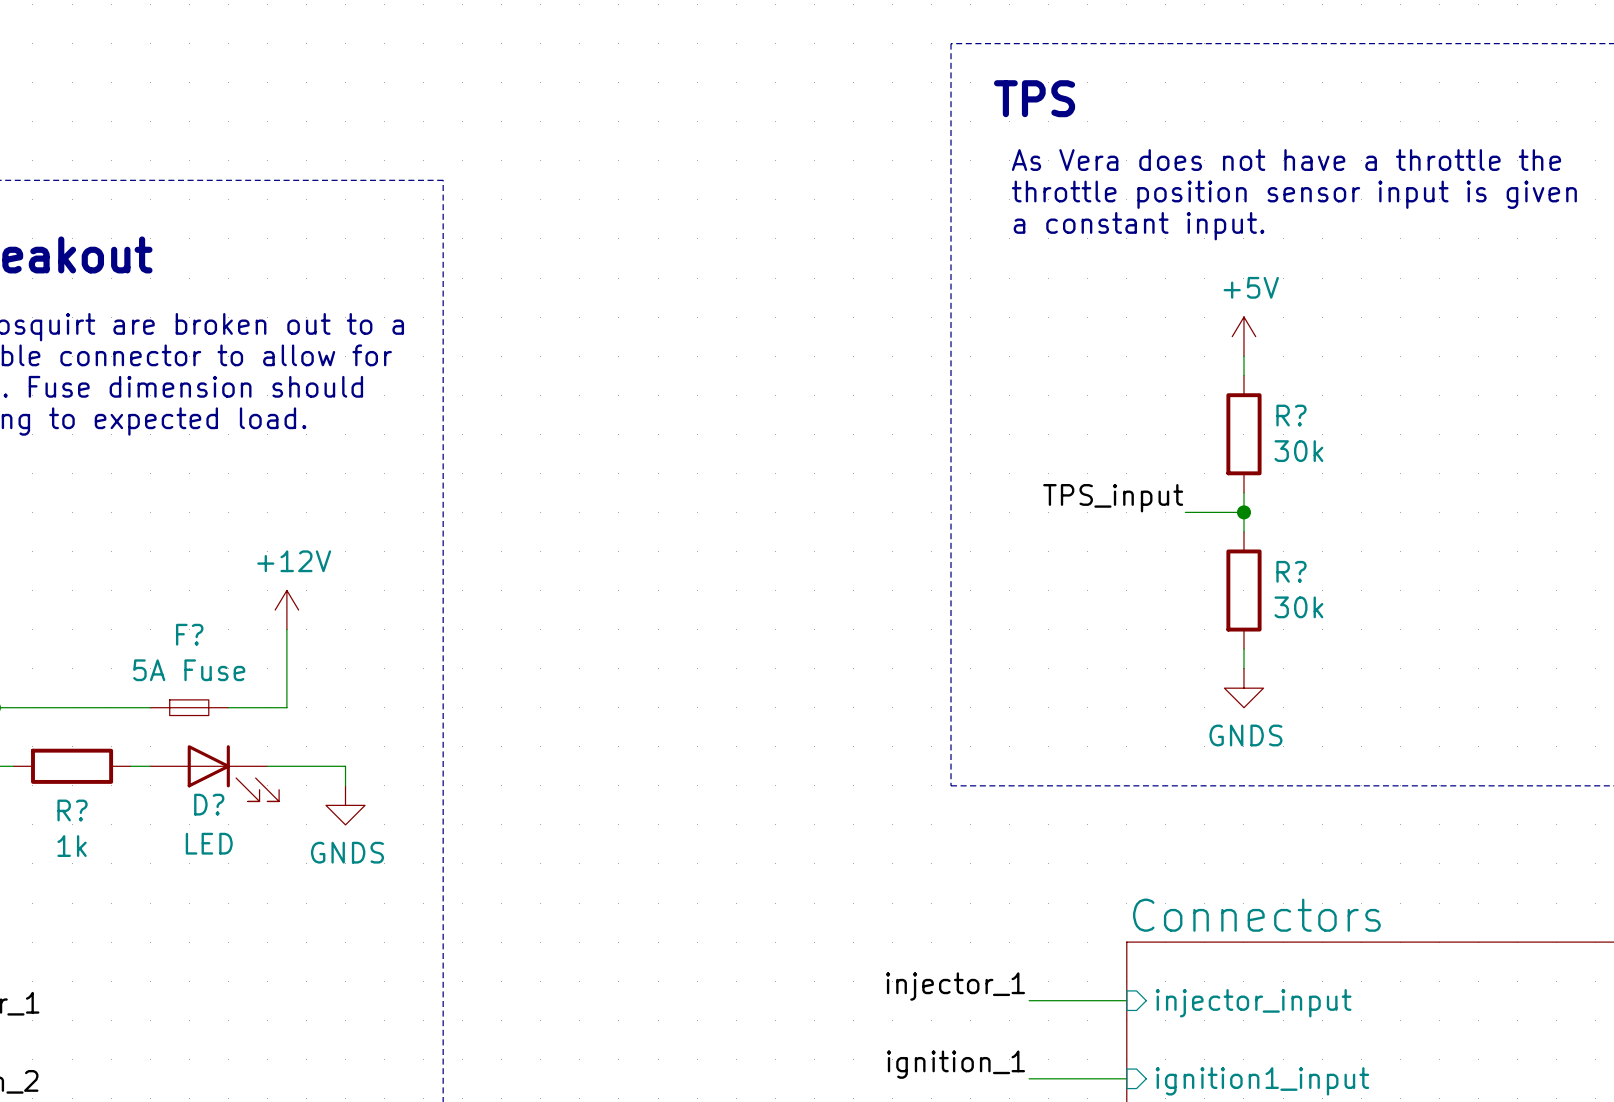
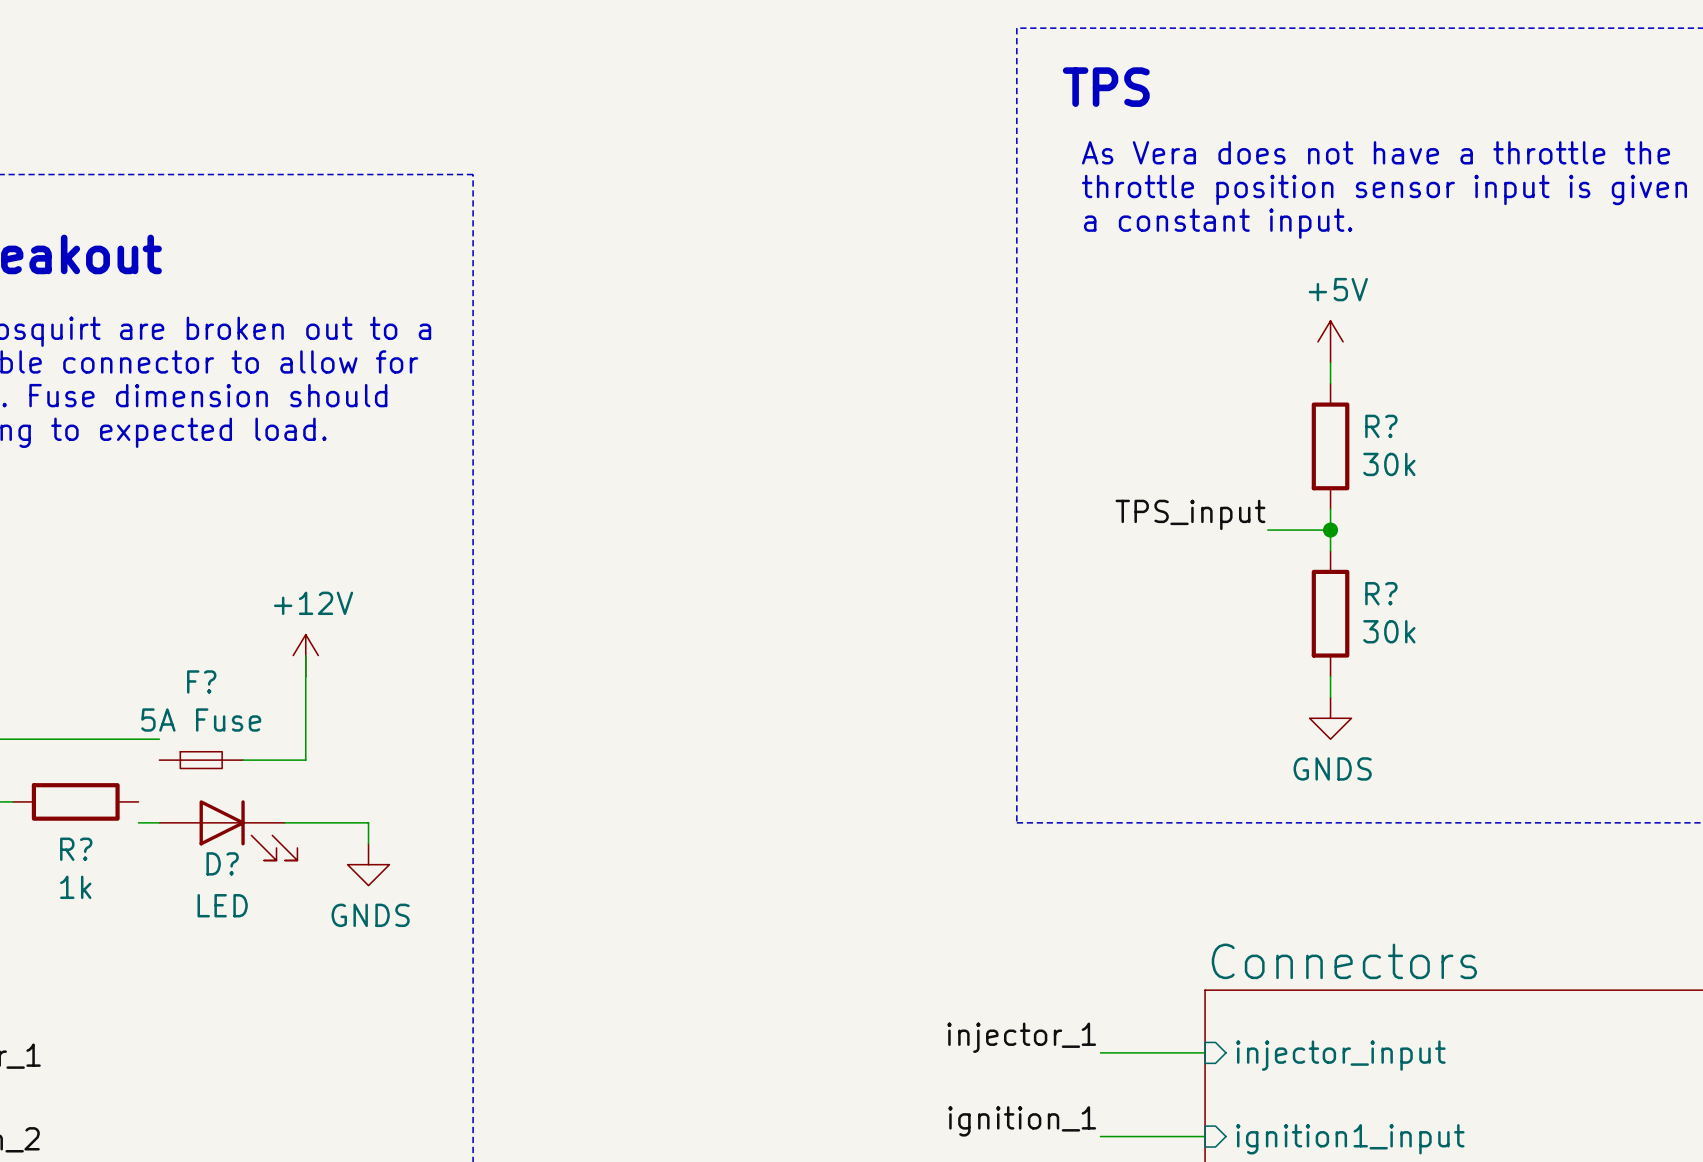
power symbol position: +12V (286, 610) -> +12V (305, 655)
F? position: (189, 707) -> (201, 760)
wire: (228, 707) (286, 707) -> (243, 760) (305, 760) (305, 739)
wire: (130, 766) (150, 766) -> (138, 822) (159, 822)
wire: (267, 766) (345, 766) (345, 785) -> (284, 822) (368, 822) (368, 843)
D? position: (214, 773) -> (228, 830)
power symbol position: GNDS (345, 805) -> GNDS (368, 864)

